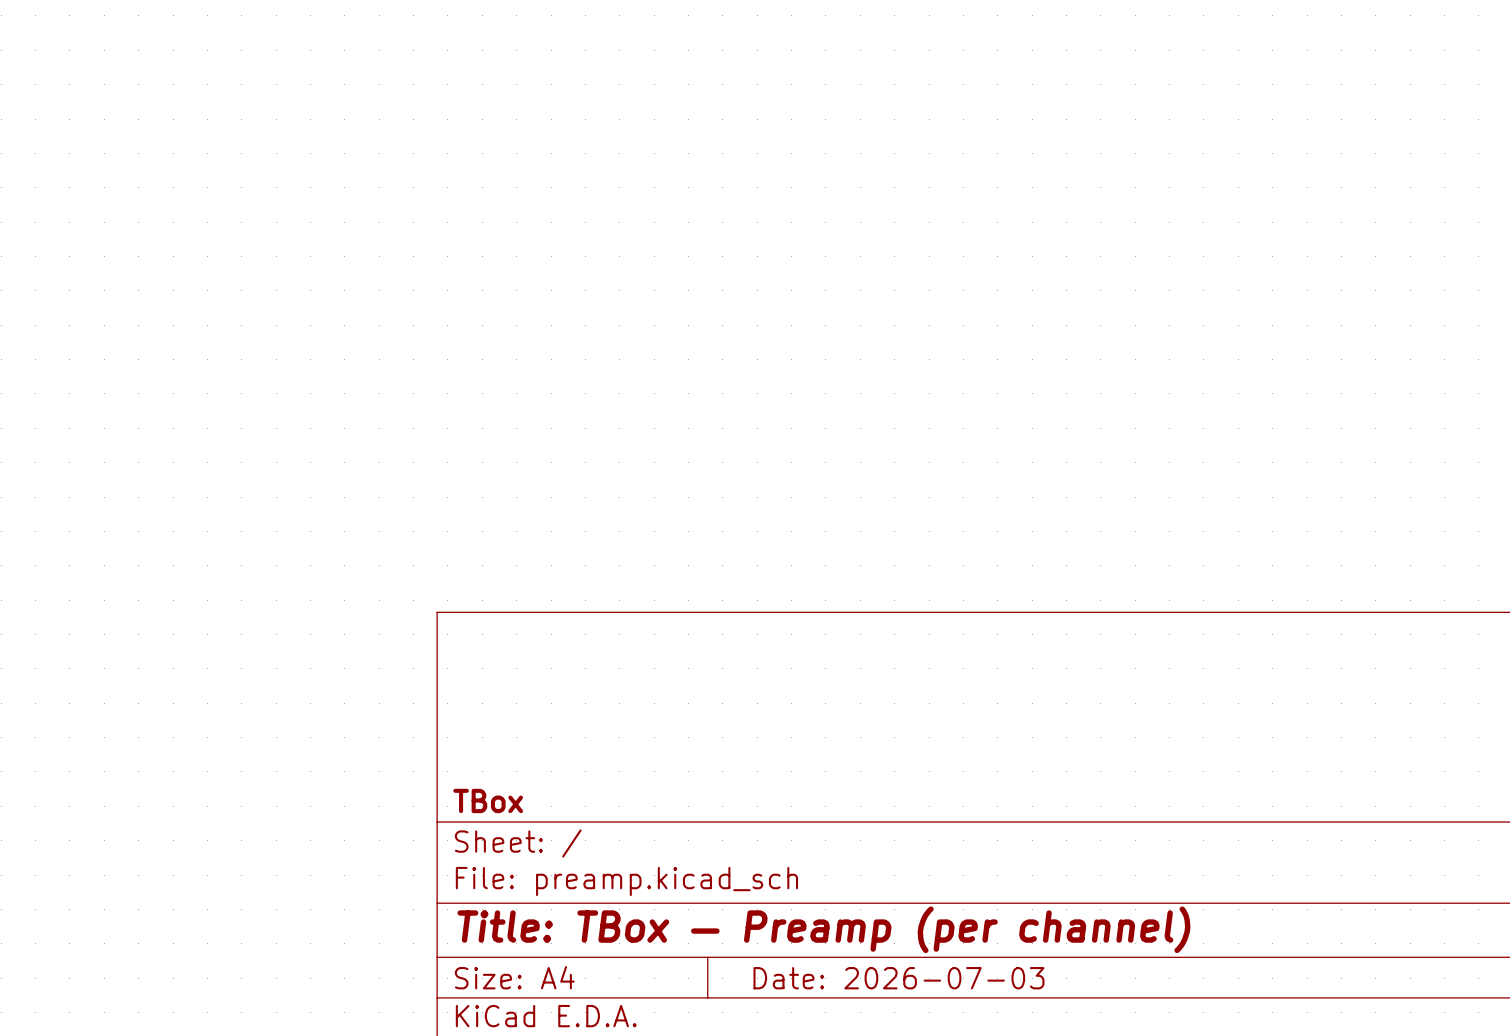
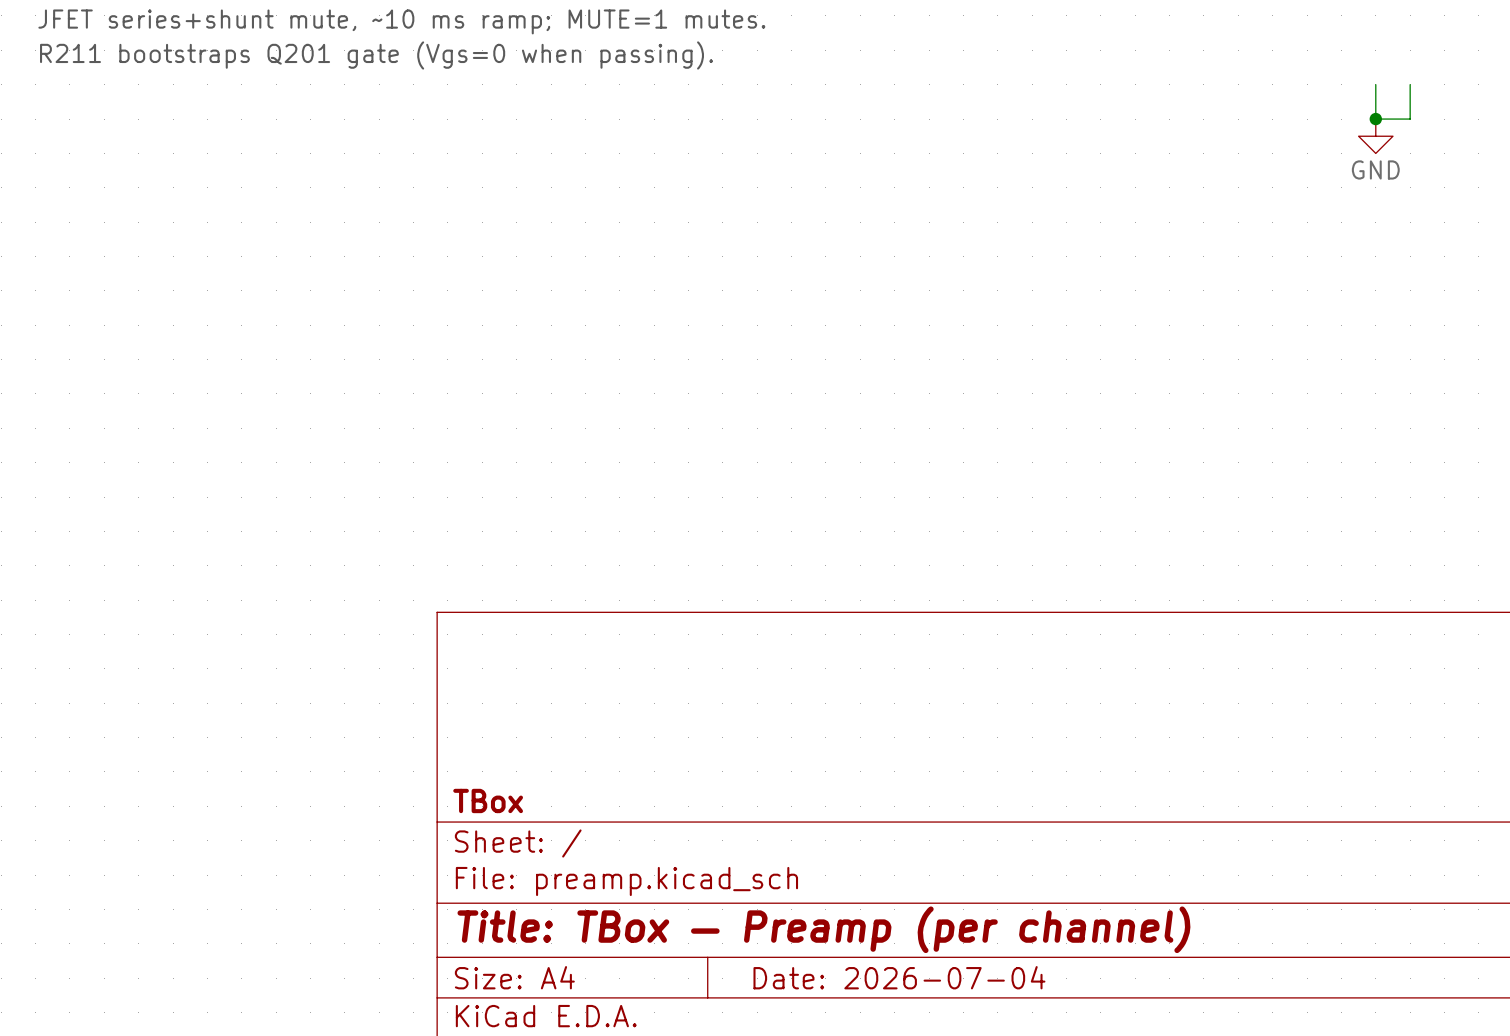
text: none -> JFET series+shunt mute, ~10 ms ramp; MUTE=1 mutes. (401, 21)
text: none -> R211 bootstraps Q201 gate (Vgs=0 when passing). (376, 55)
wire: none -> (1375, 84) (1375, 119) (1410, 119) (1410, 84)
junction: none -> (1375, 119)
power symbol: none -> GND (1375, 136)
title block: Date: 2026-07-03 (898, 978) -> Date: 2026-07-04 (899, 977)

